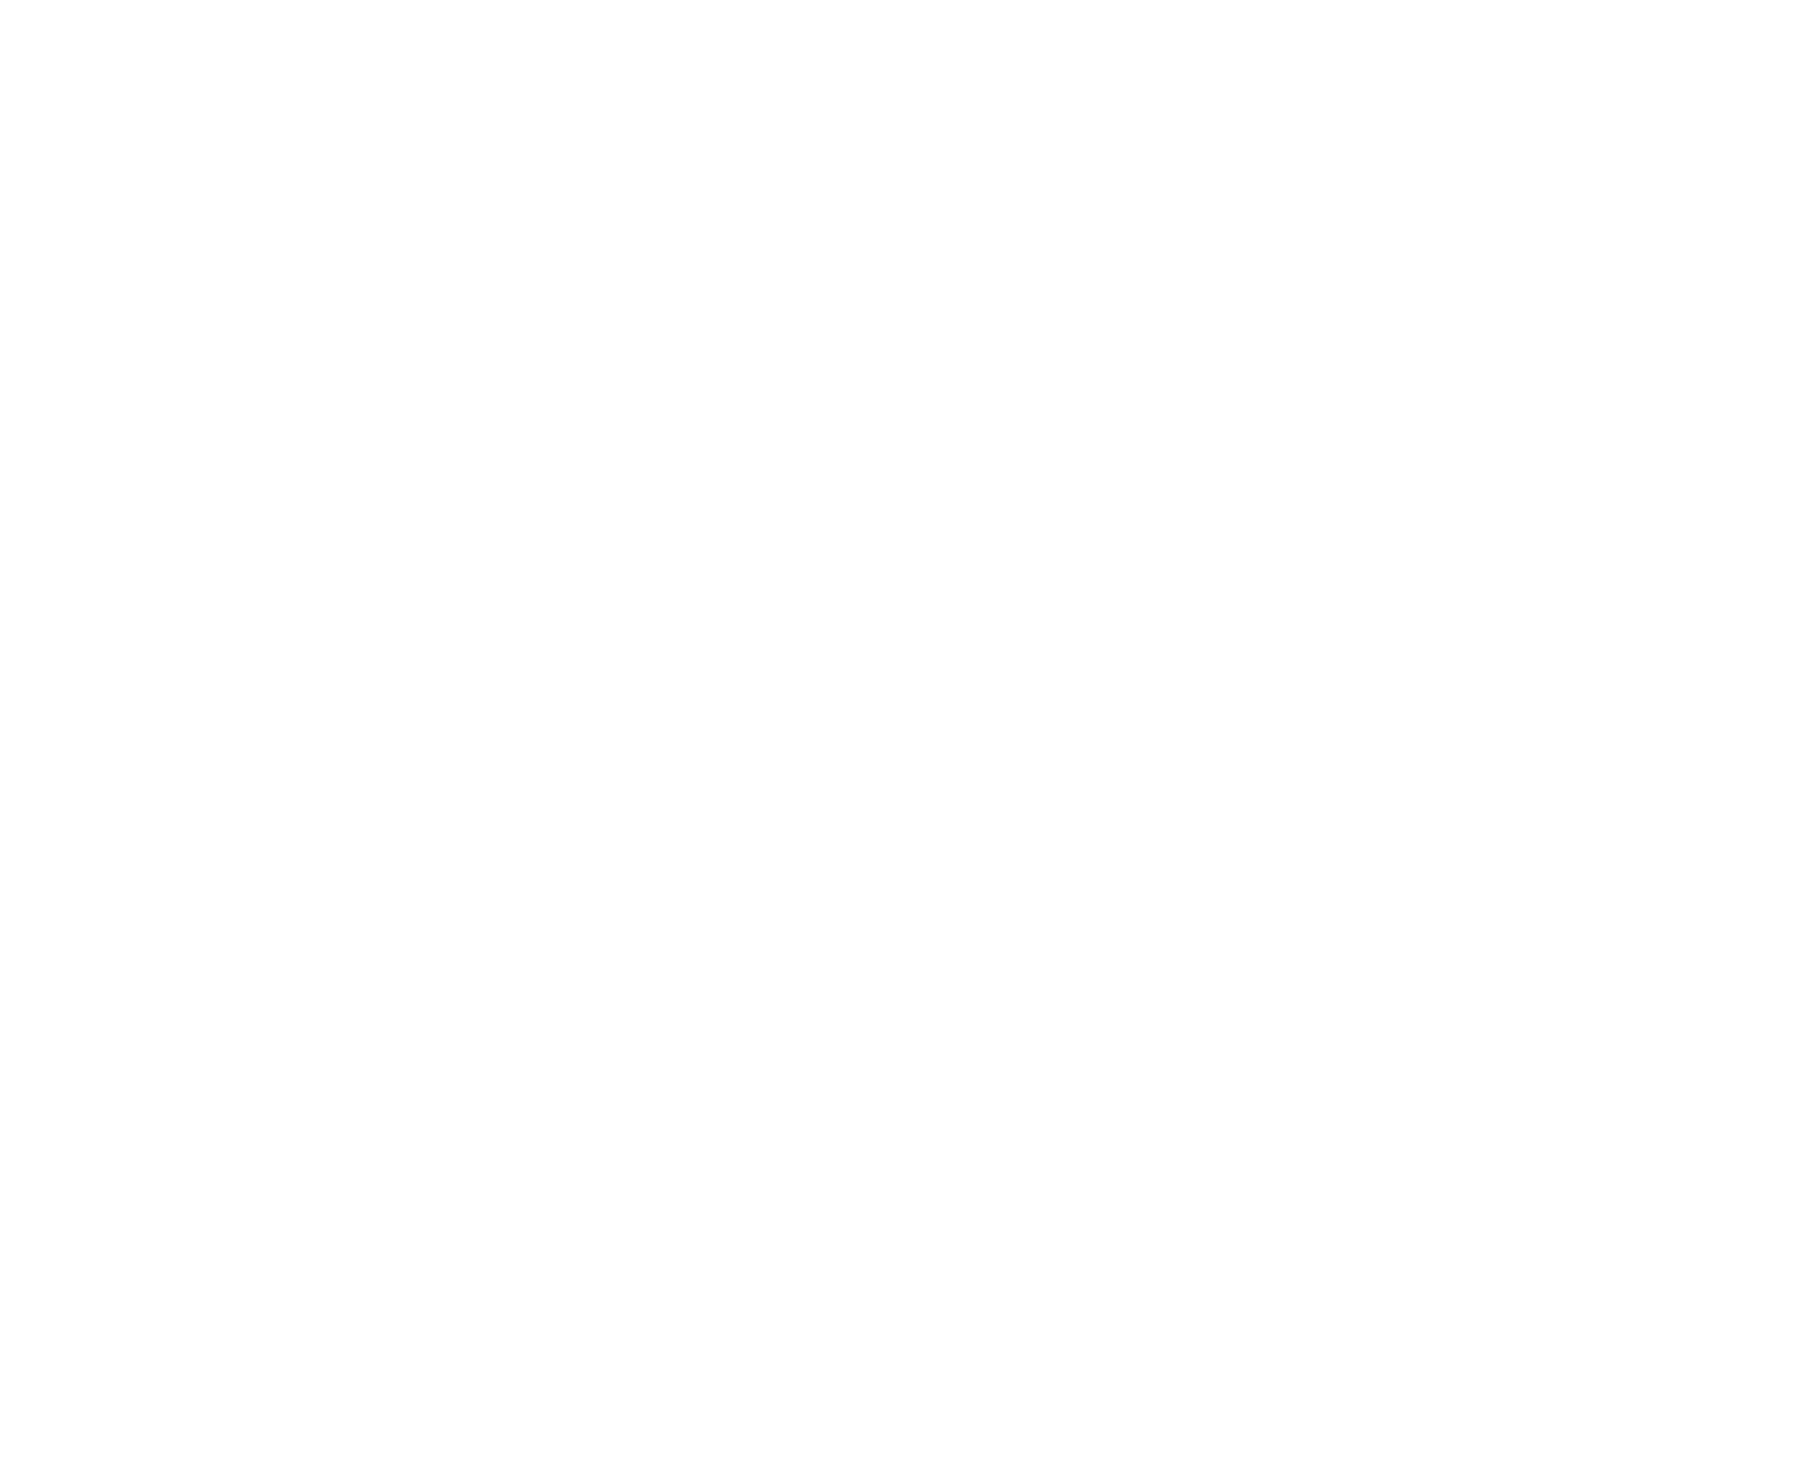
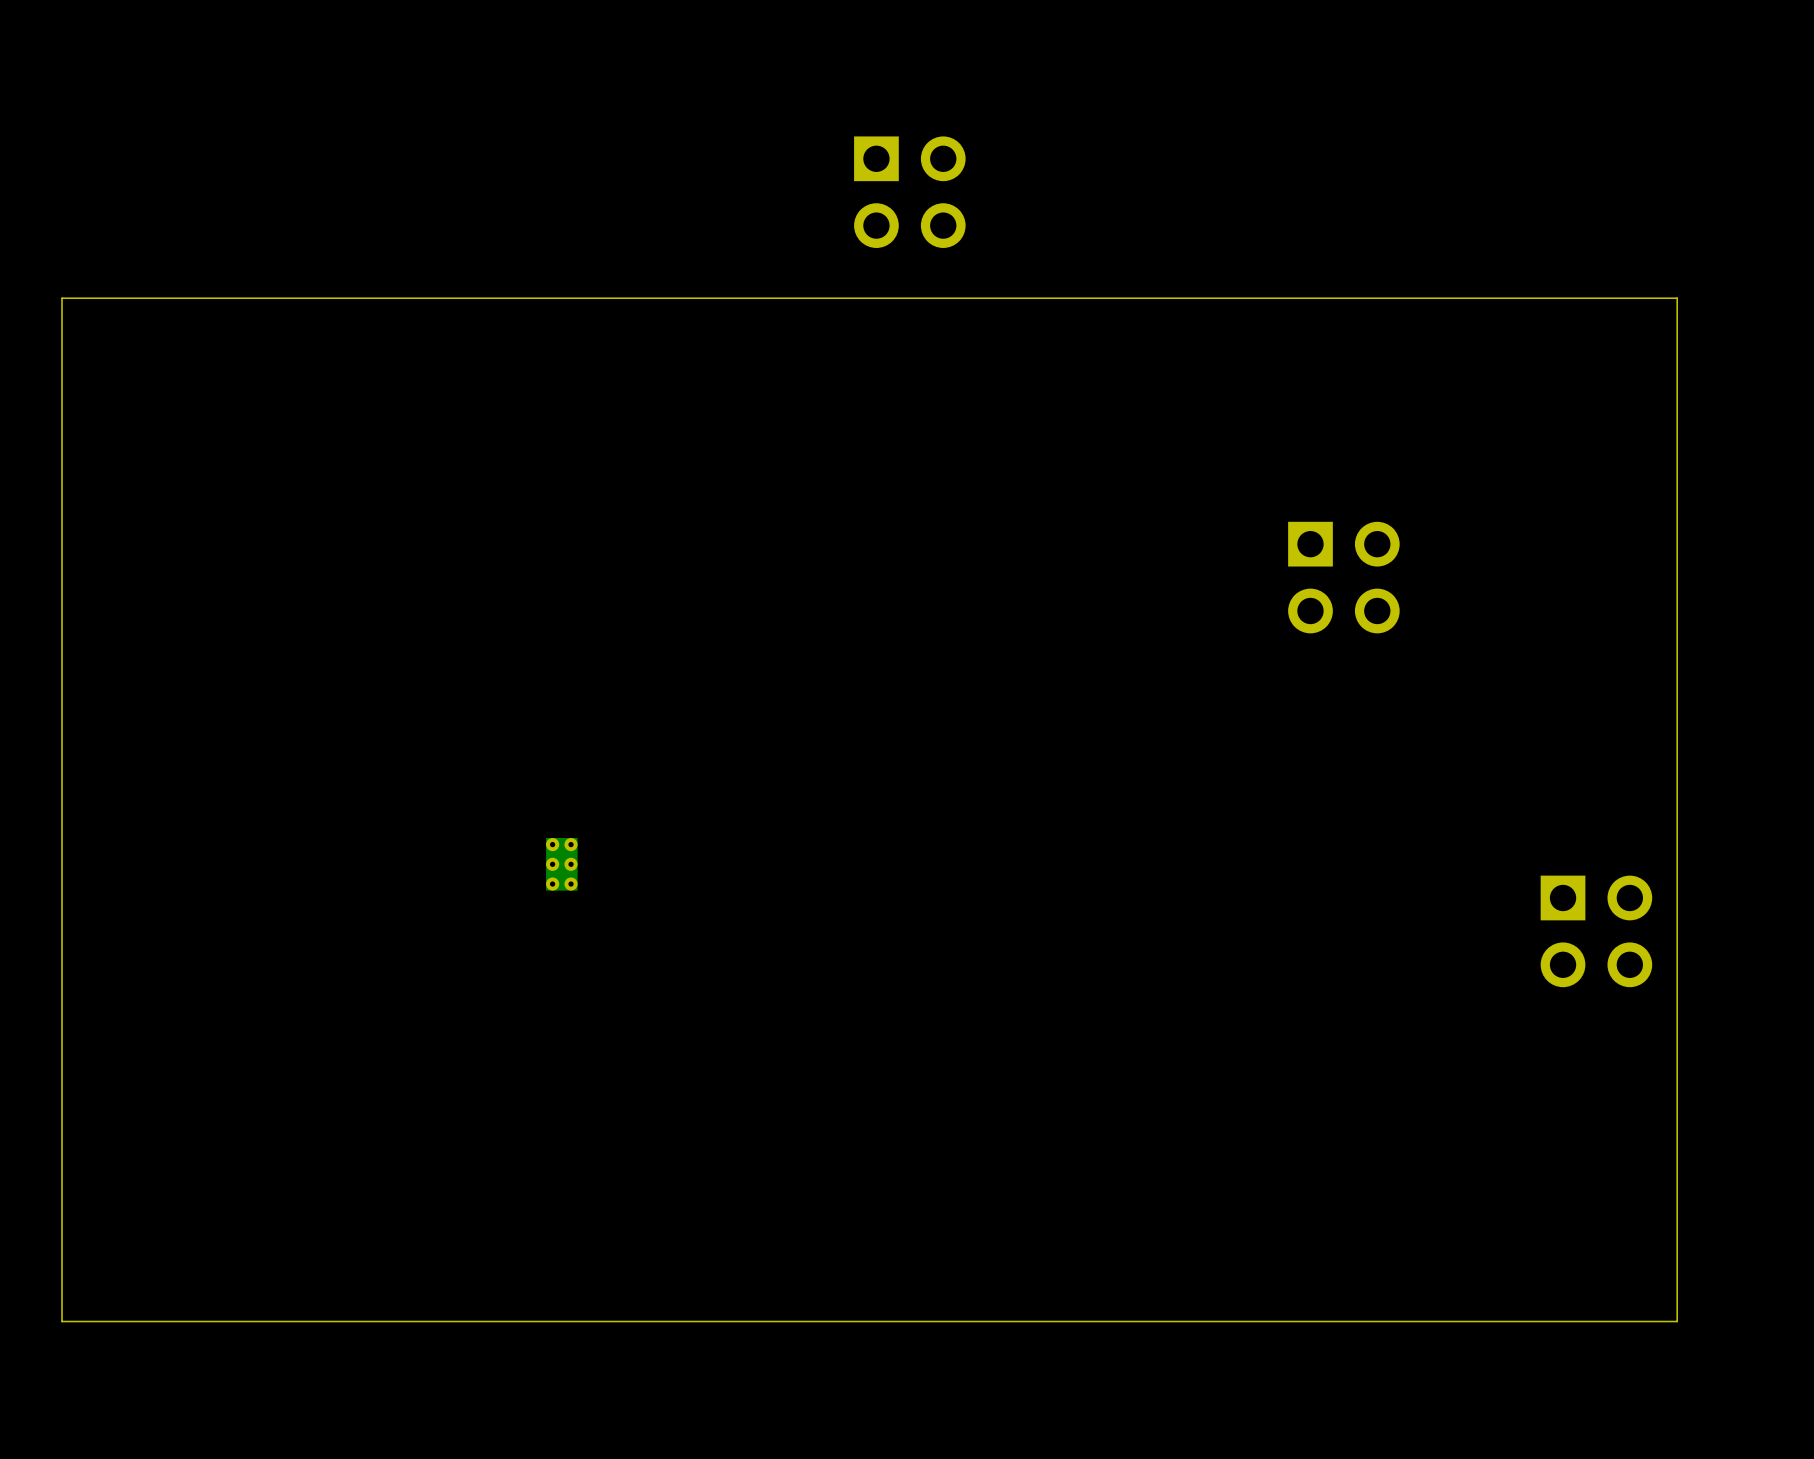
part: none -> (909, 192)
board edge: none -> (1677, 298) (62, 298) (62, 1321) (1677, 1321) (1677, 298)
part: none -> (1343, 577)
part: none -> (561, 864)
part: none -> (1596, 931)

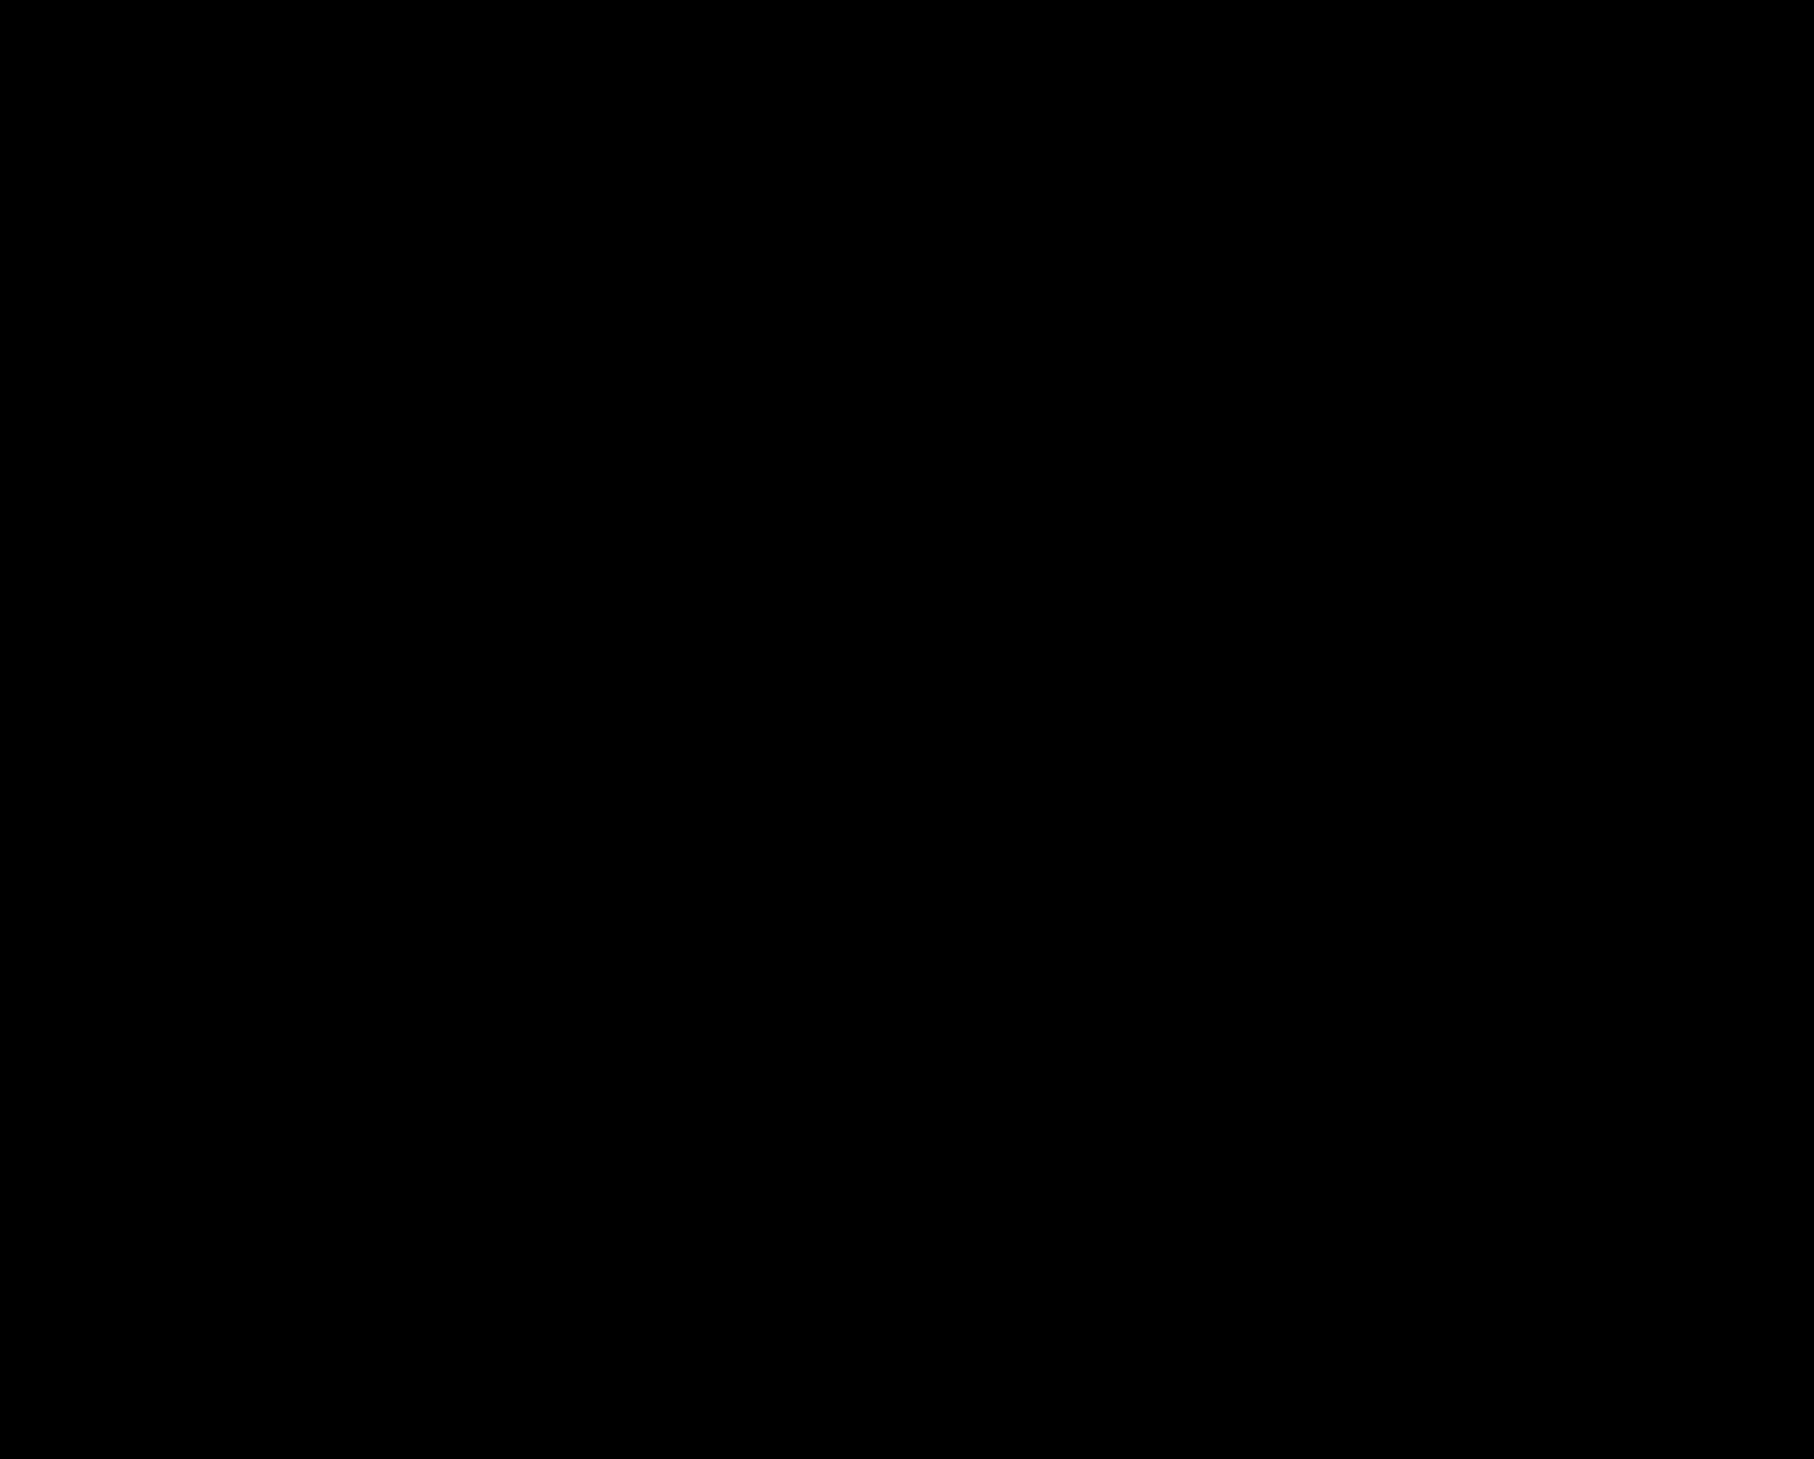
part: (909, 192) -> none
board edge: (1677, 298) (62, 298) (62, 1321) (1677, 1321) (1677, 298) -> none
part: (1343, 577) -> none
part: (561, 864) -> none
part: (1596, 931) -> none

